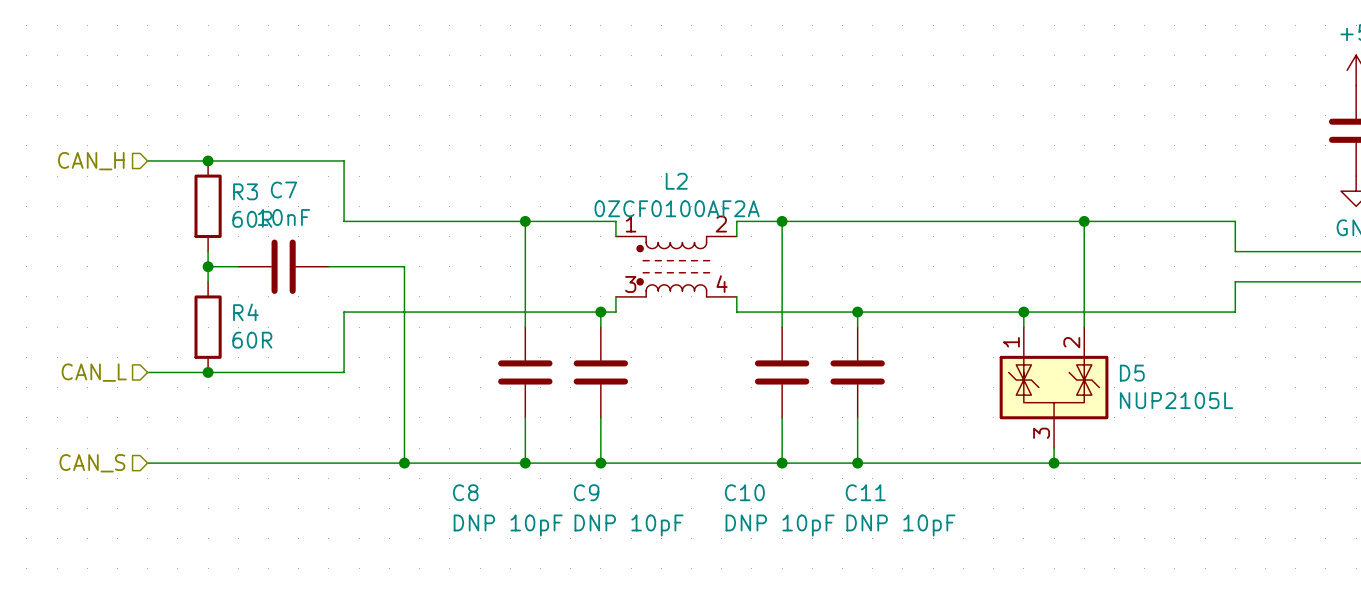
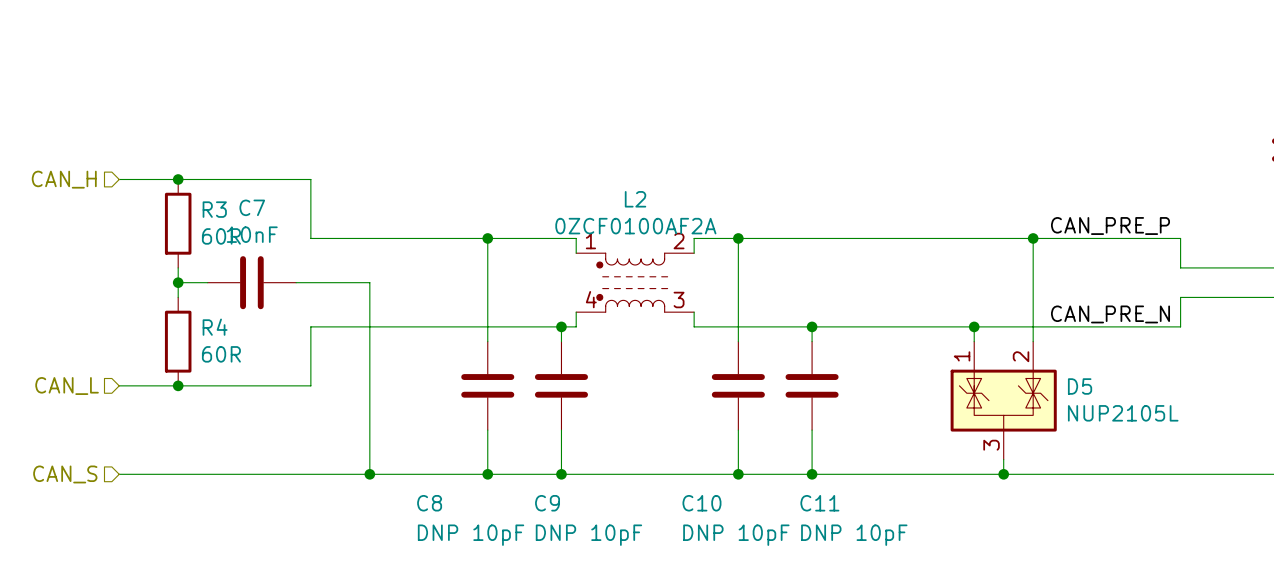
label: none -> CAN_PRE_P (1110, 226)
L2 pin number: 3 (630, 284) -> 4 (591, 299)
L2 pin number: 4 (722, 284) -> 3 (679, 300)
label: none -> CAN_PRE_N (1110, 314)

